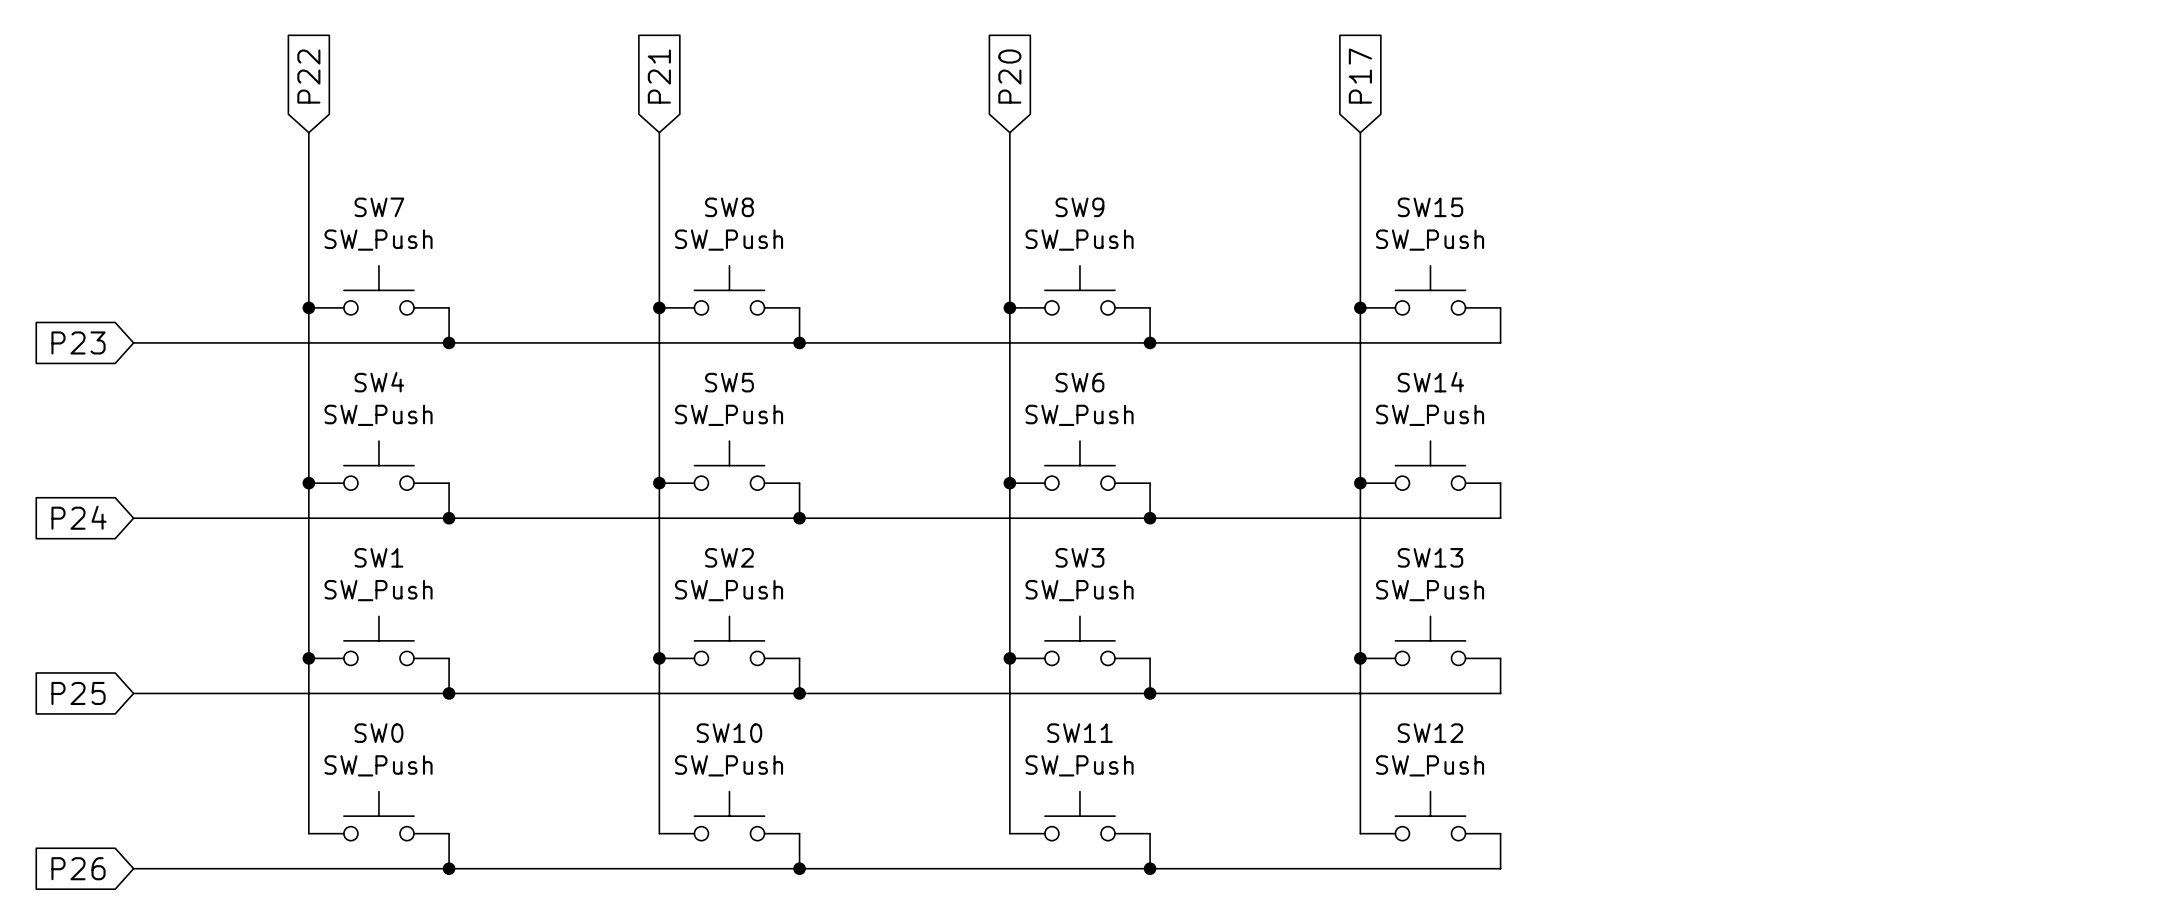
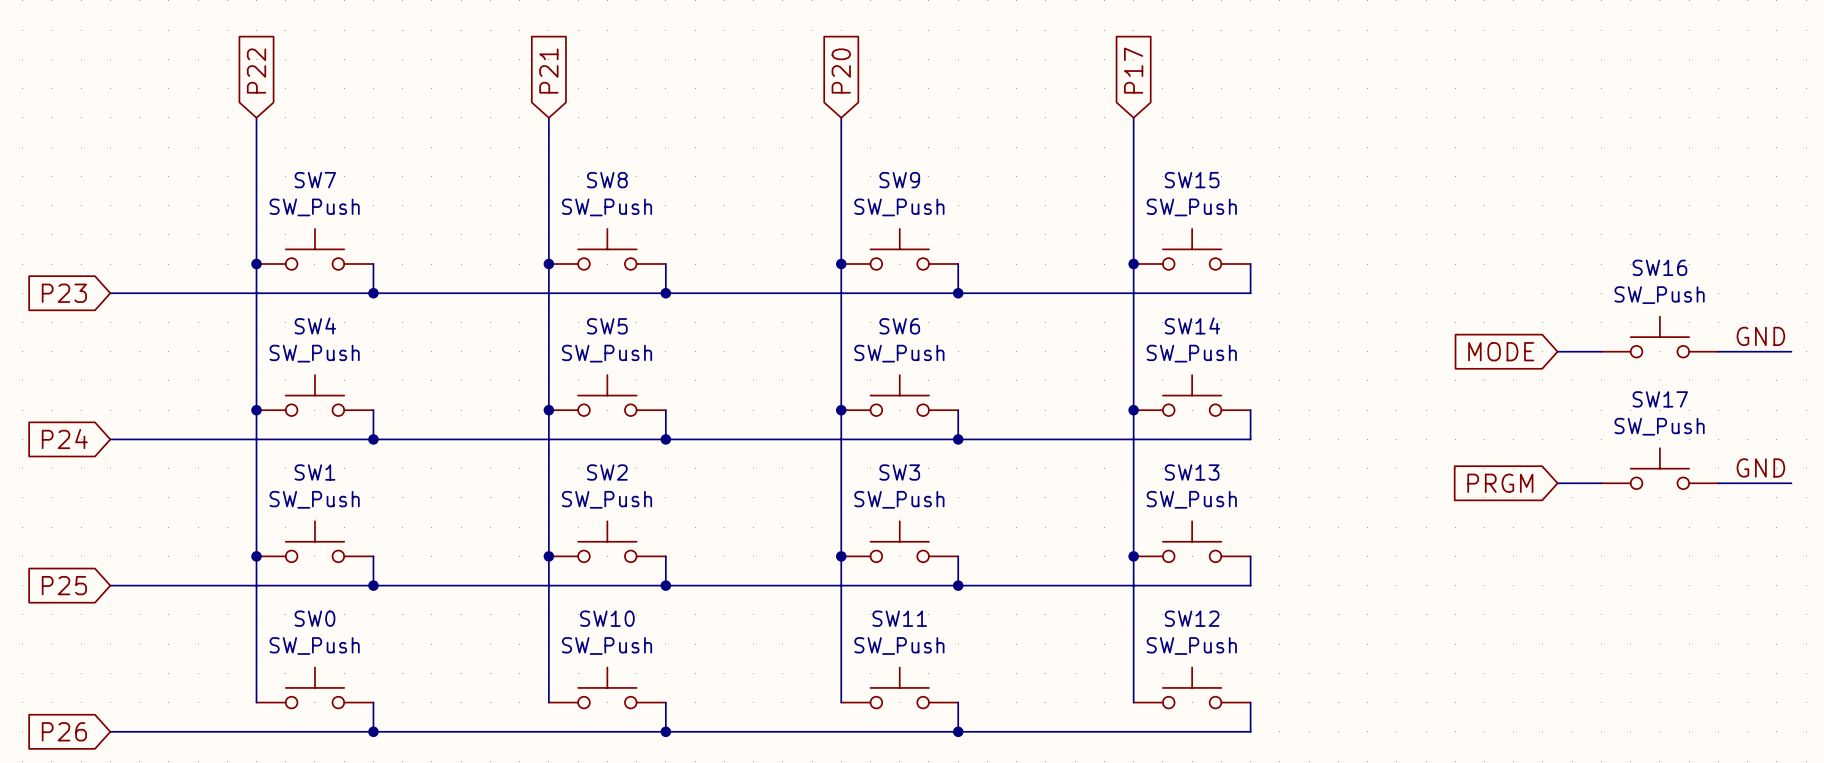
label: none -> GND (1760, 336)
SW16: none -> SW_Push (1659, 337)
global label: none -> MODE (1501, 351)
wire: none -> (1557, 351) (1601, 351)
wire: none -> (1718, 351) (1791, 351)
label: none -> GND (1760, 467)
SW17: none -> SW_Push (1659, 468)
global label: none -> PRGM (1500, 483)
wire: none -> (1557, 483) (1601, 483)
wire: none -> (1718, 483) (1791, 483)

